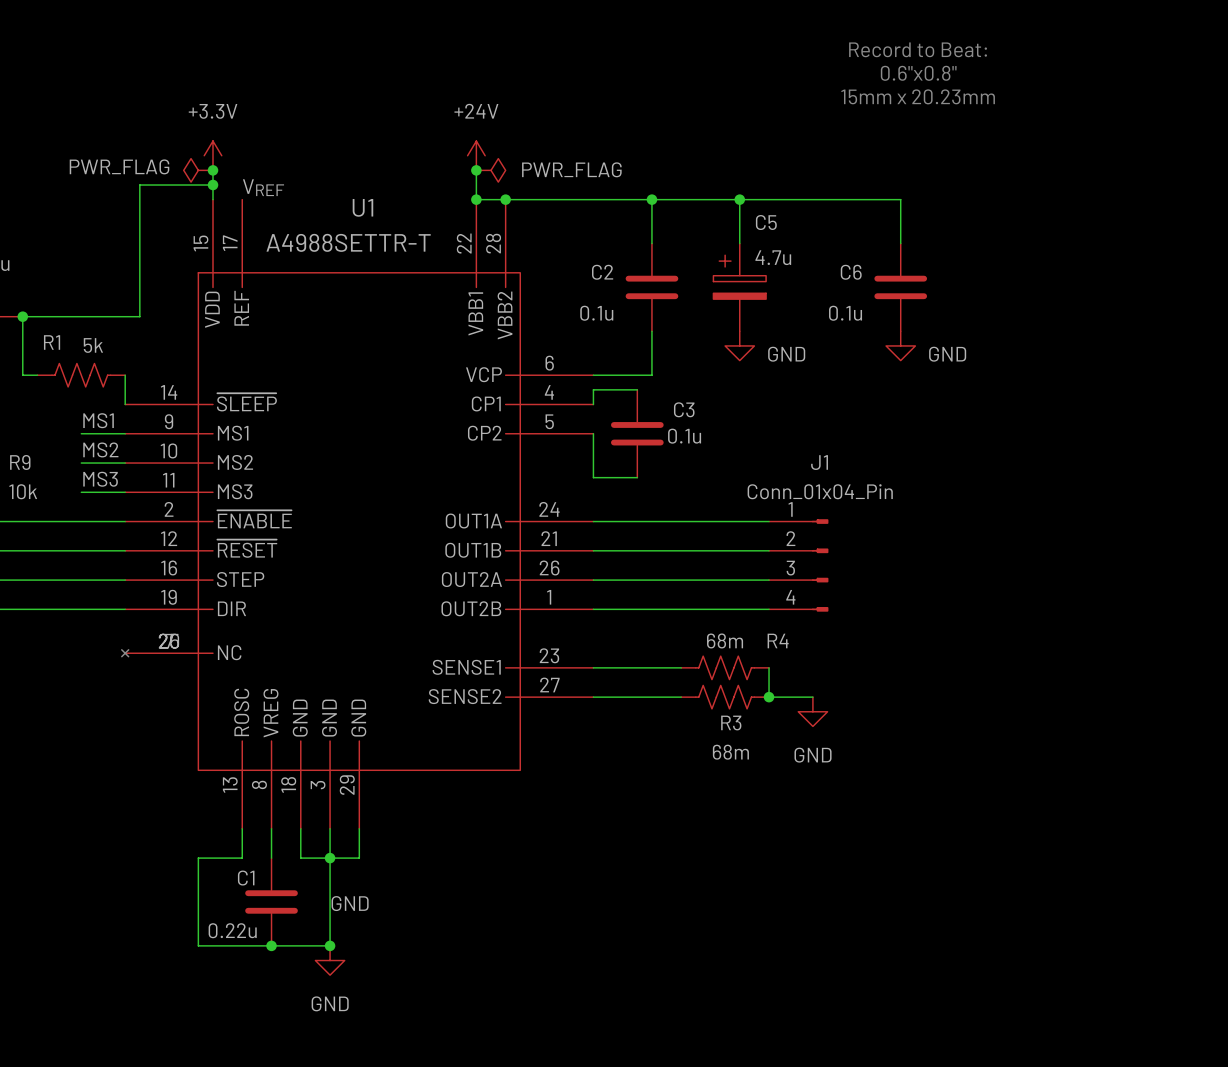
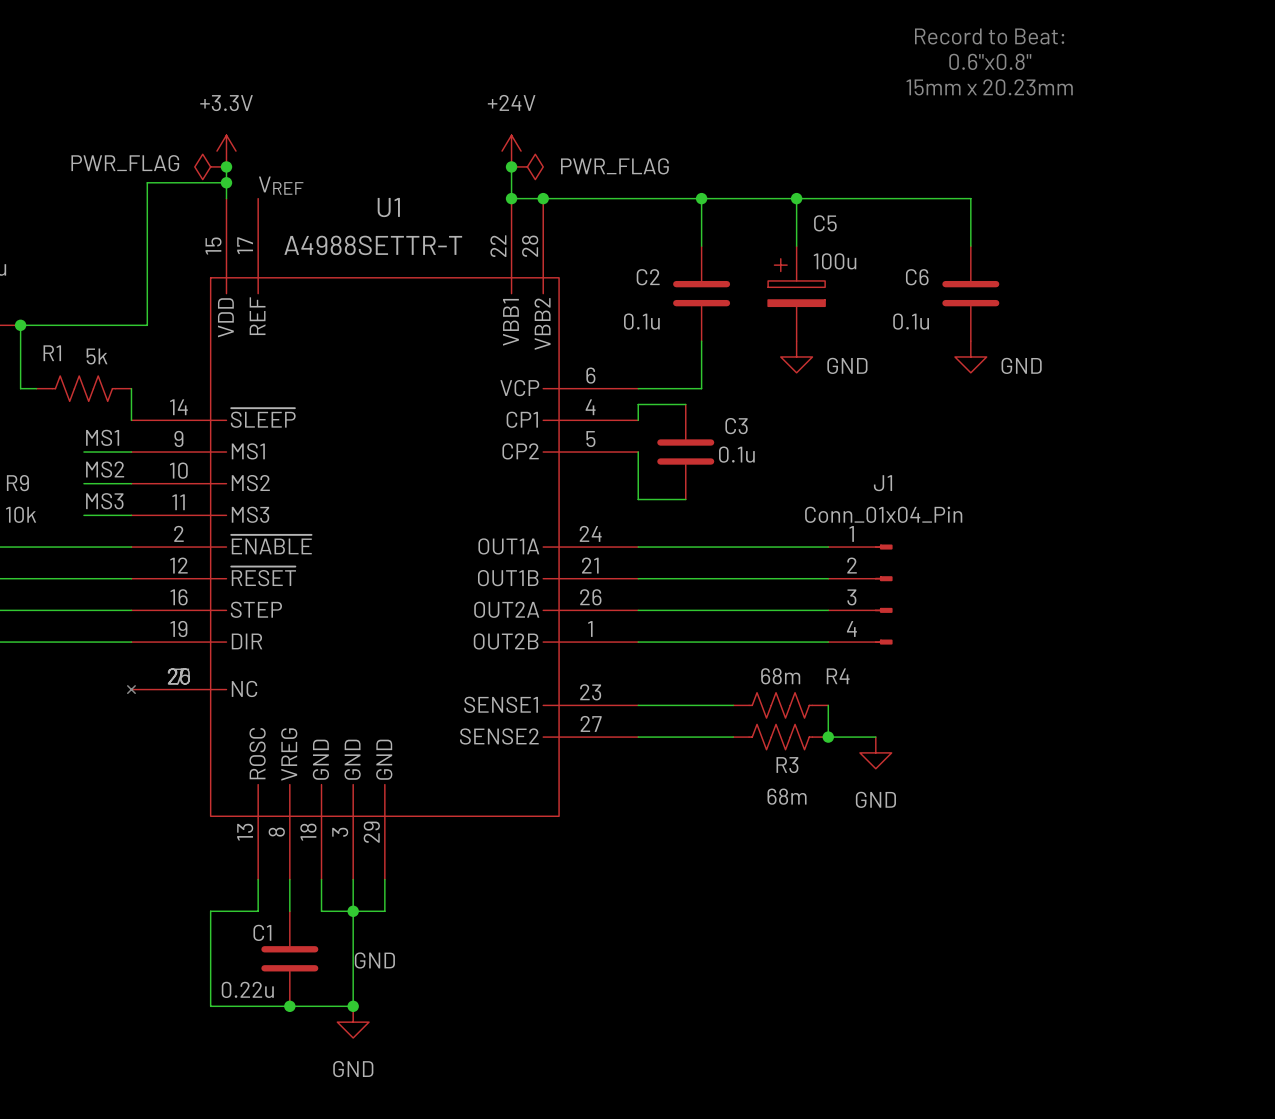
C5 value: 4.7u (773, 257) -> 100u (835, 261)

